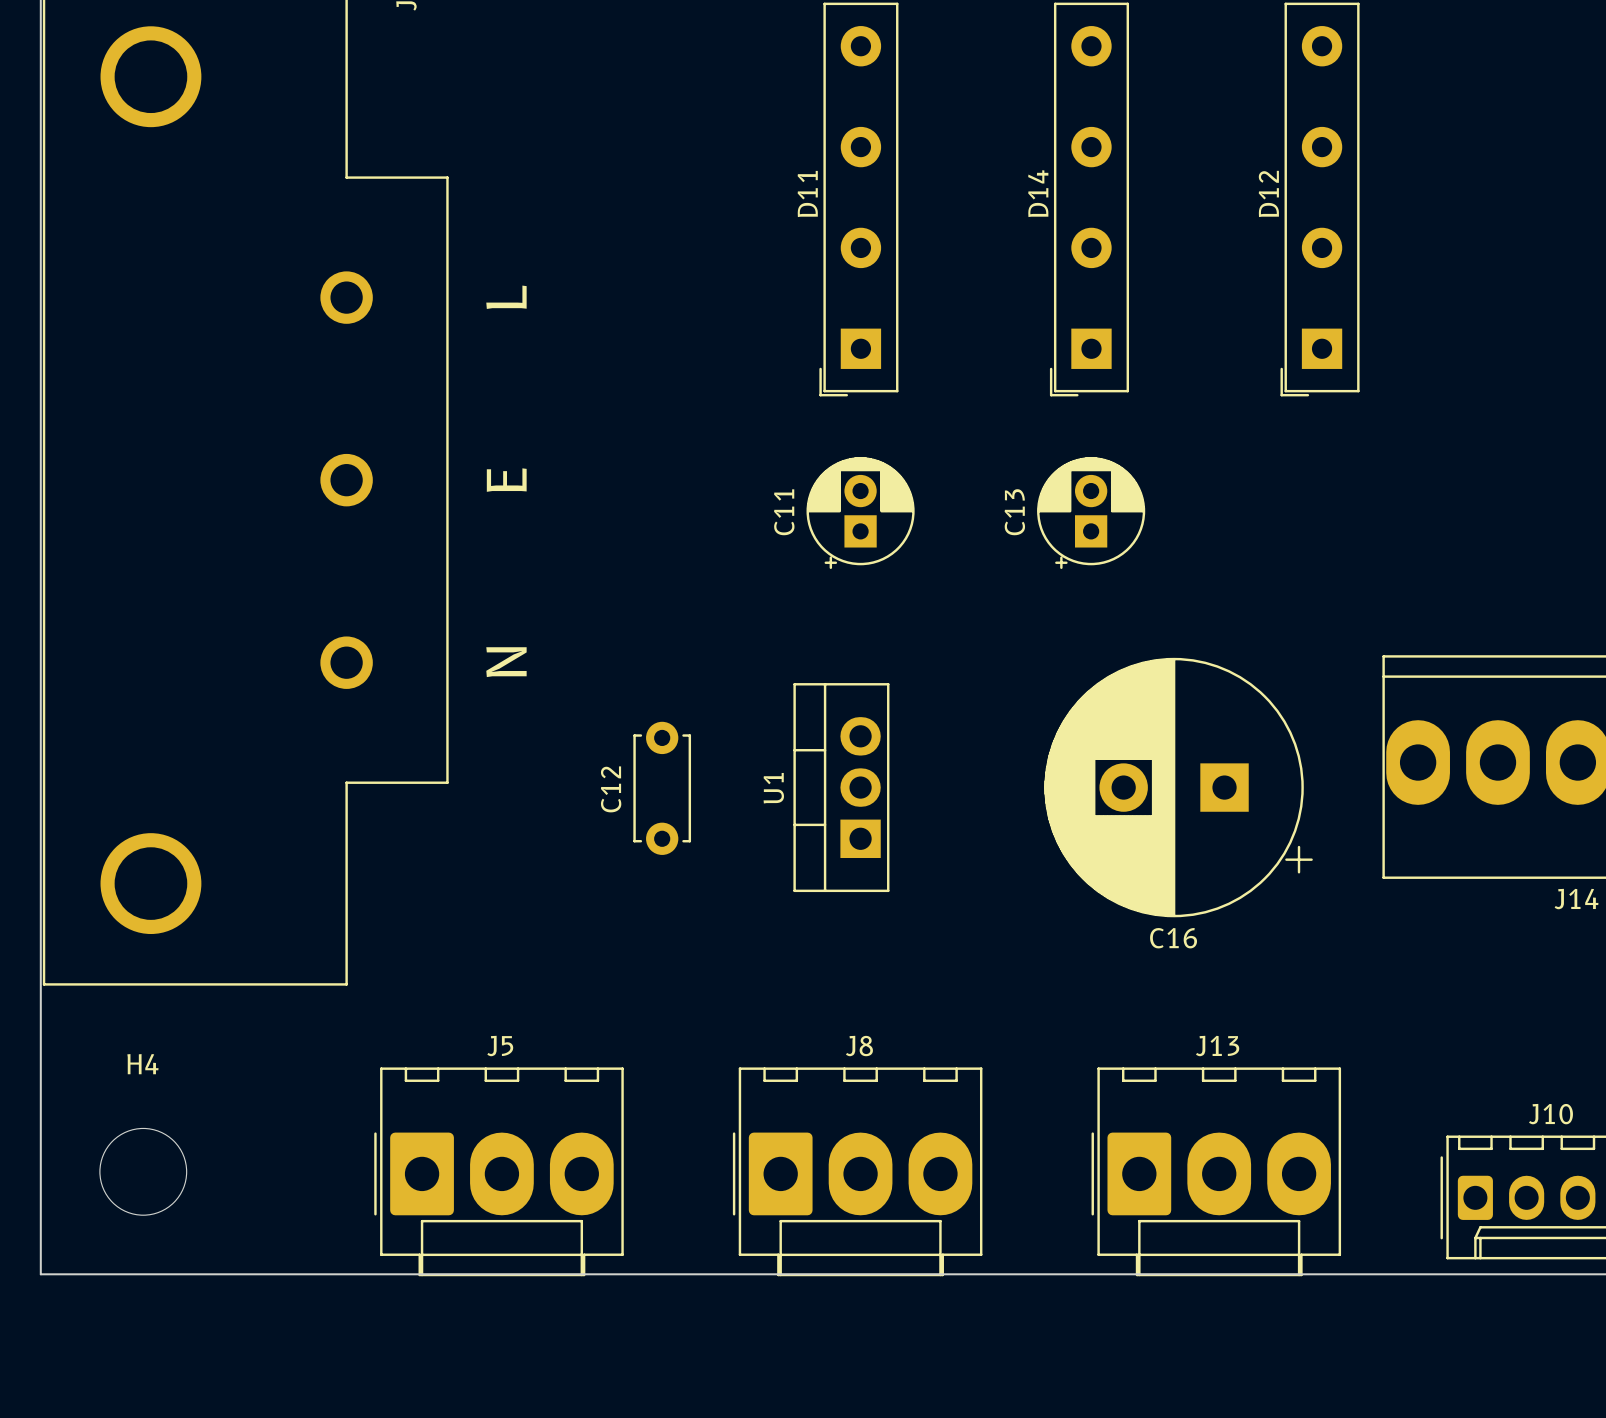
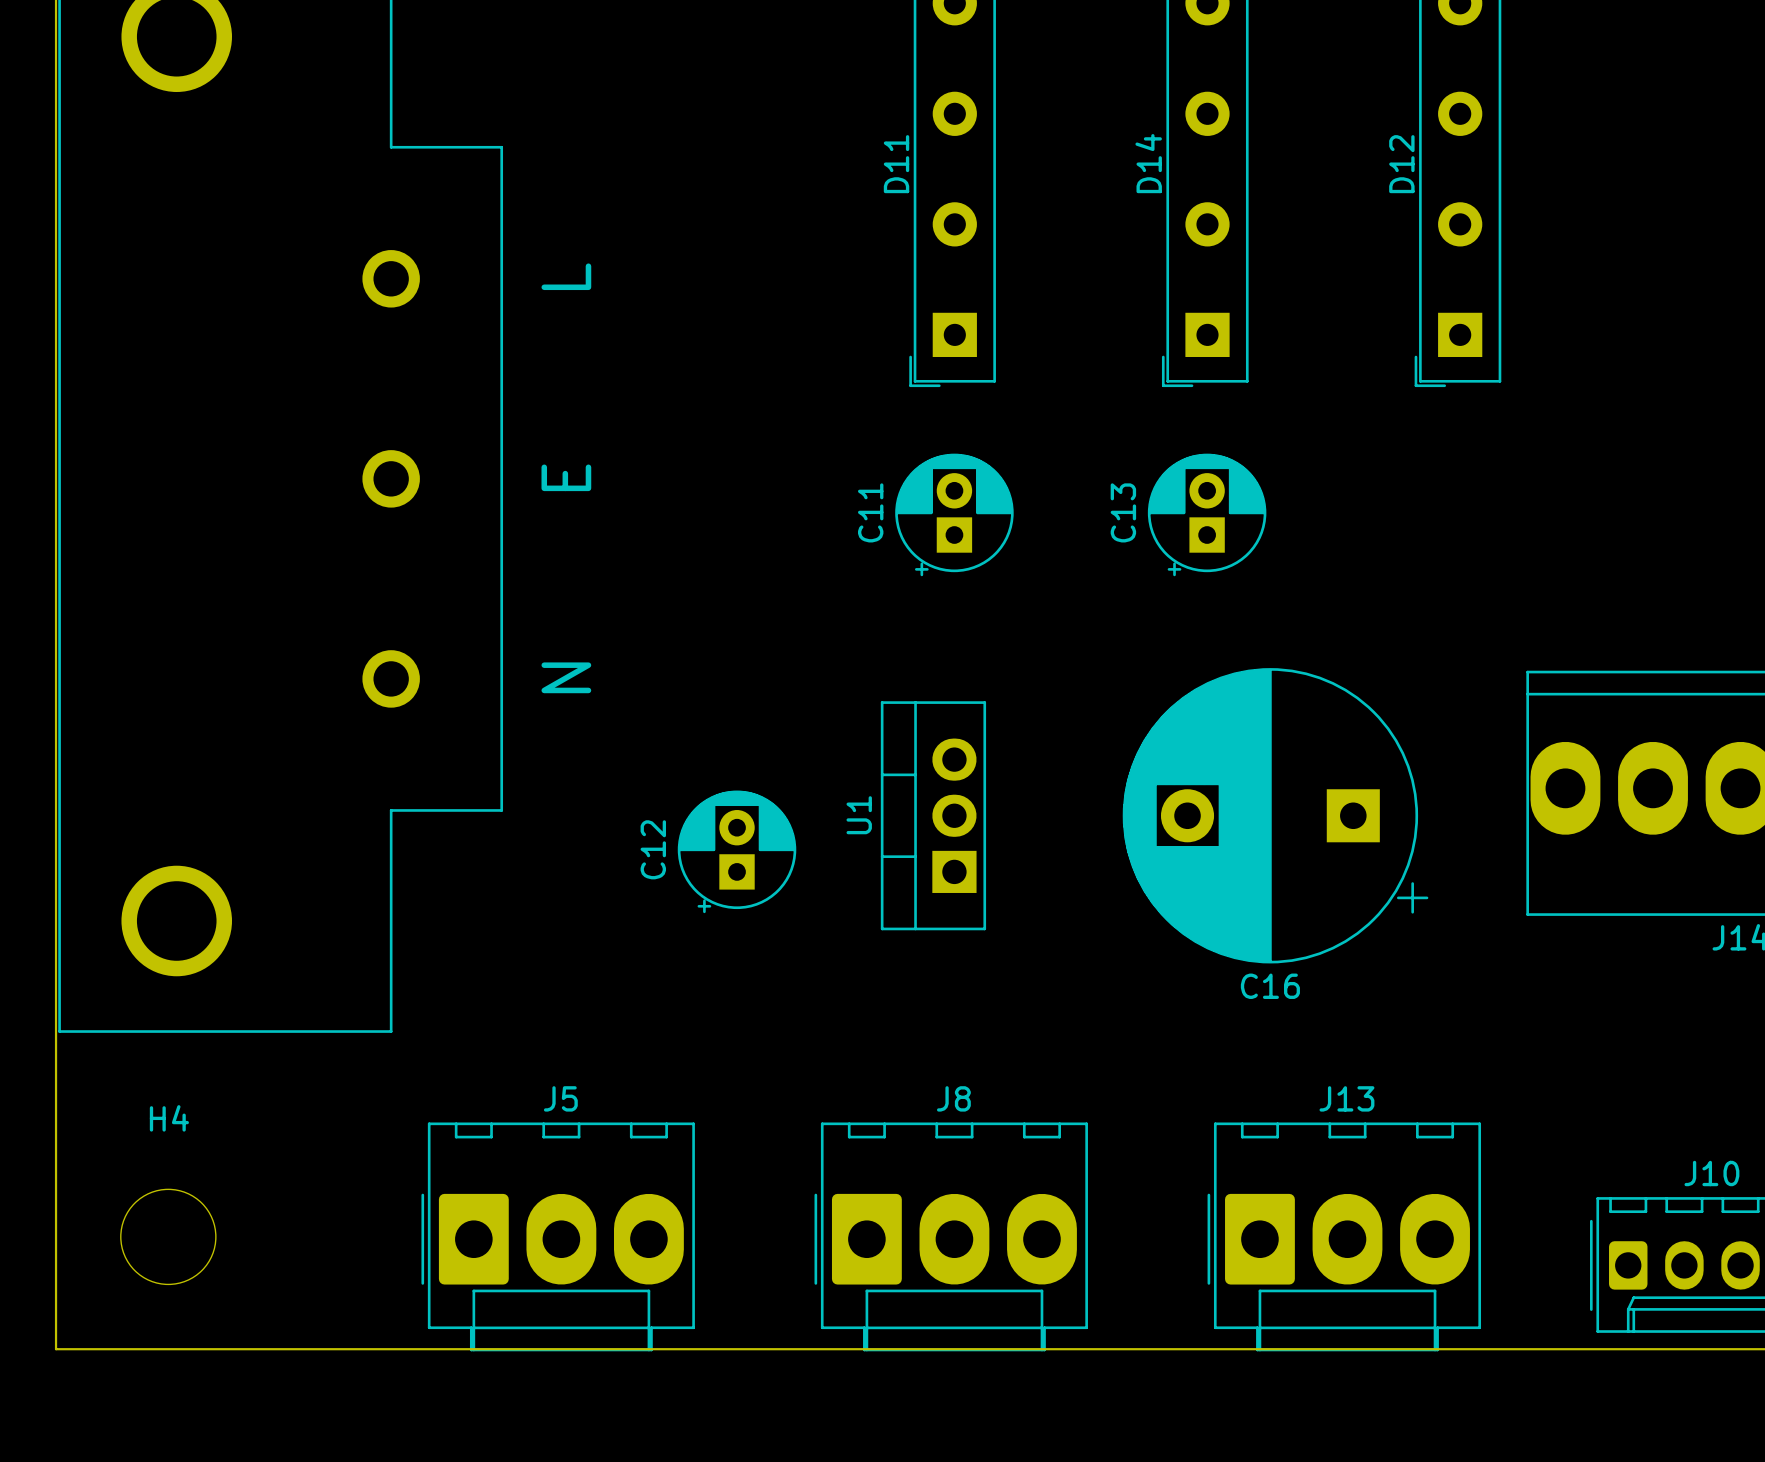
C16 footprint: [1044, 657, 1313, 918] -> [1122, 668, 1429, 964]
C12 footprint: [633, 721, 692, 855] -> [677, 790, 797, 914]

